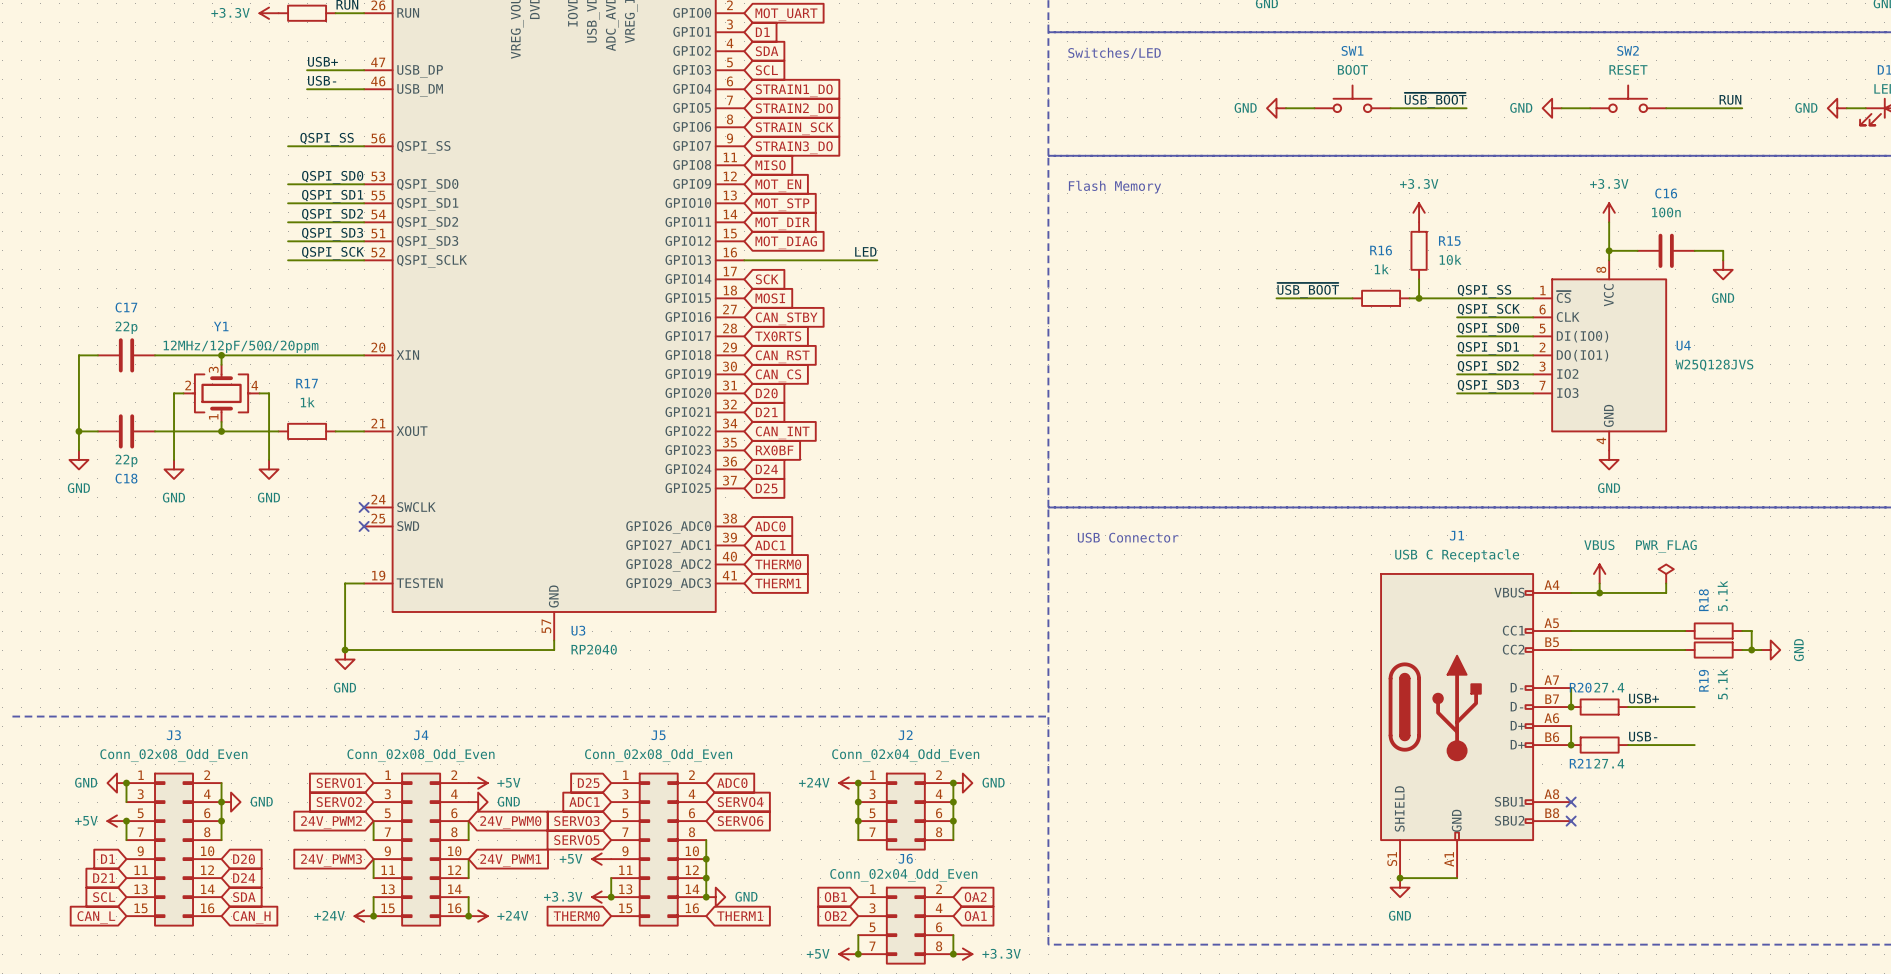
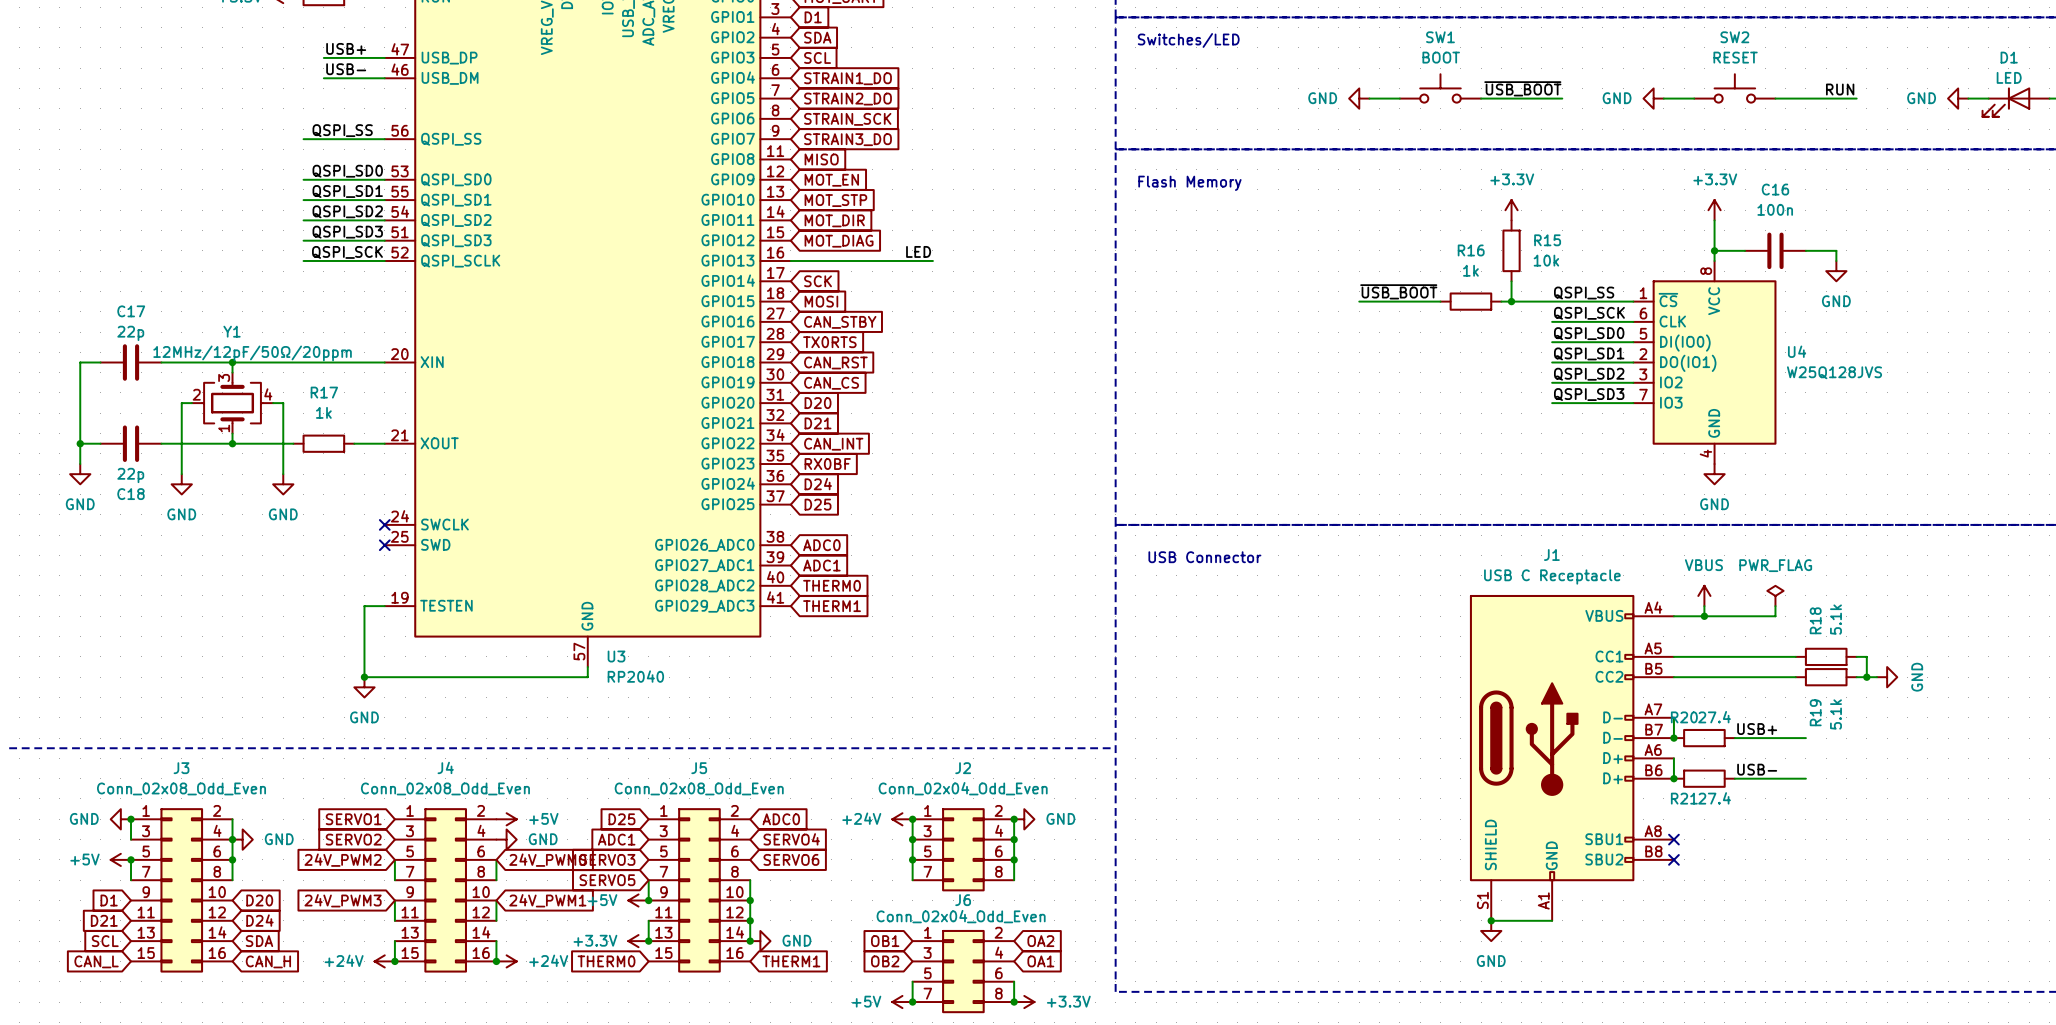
wire: none -> (648, 880) (648, 900)
junction: none -> (648, 900)

